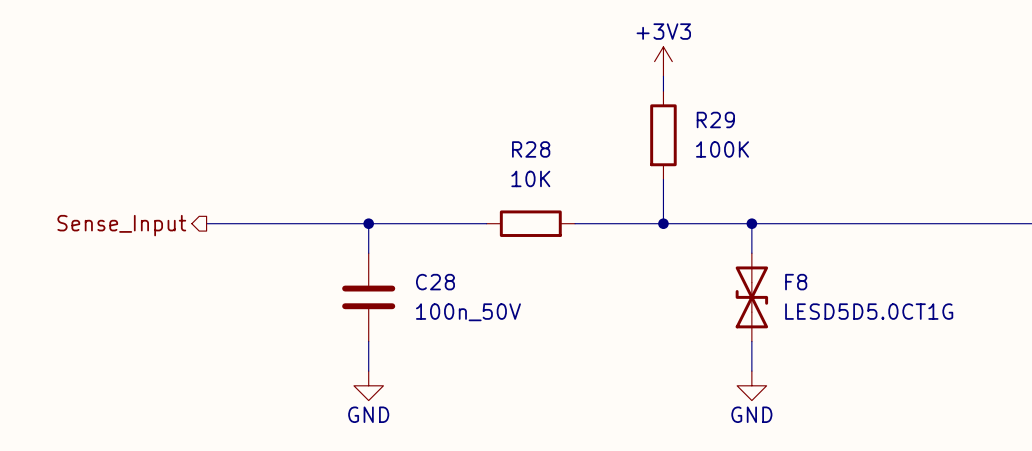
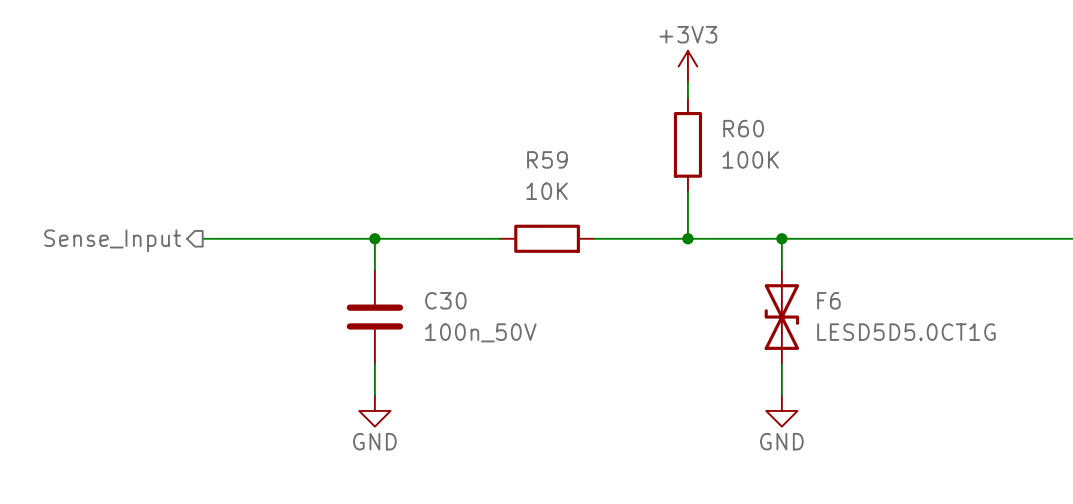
R29 name: R29 (715, 119) -> R60 (743, 128)
R28 name: R28 (531, 149) -> R59 (547, 159)
C28 name: C28 (435, 282) -> C30 (445, 300)
F8 name: F8 (796, 282) -> F6 (828, 300)

